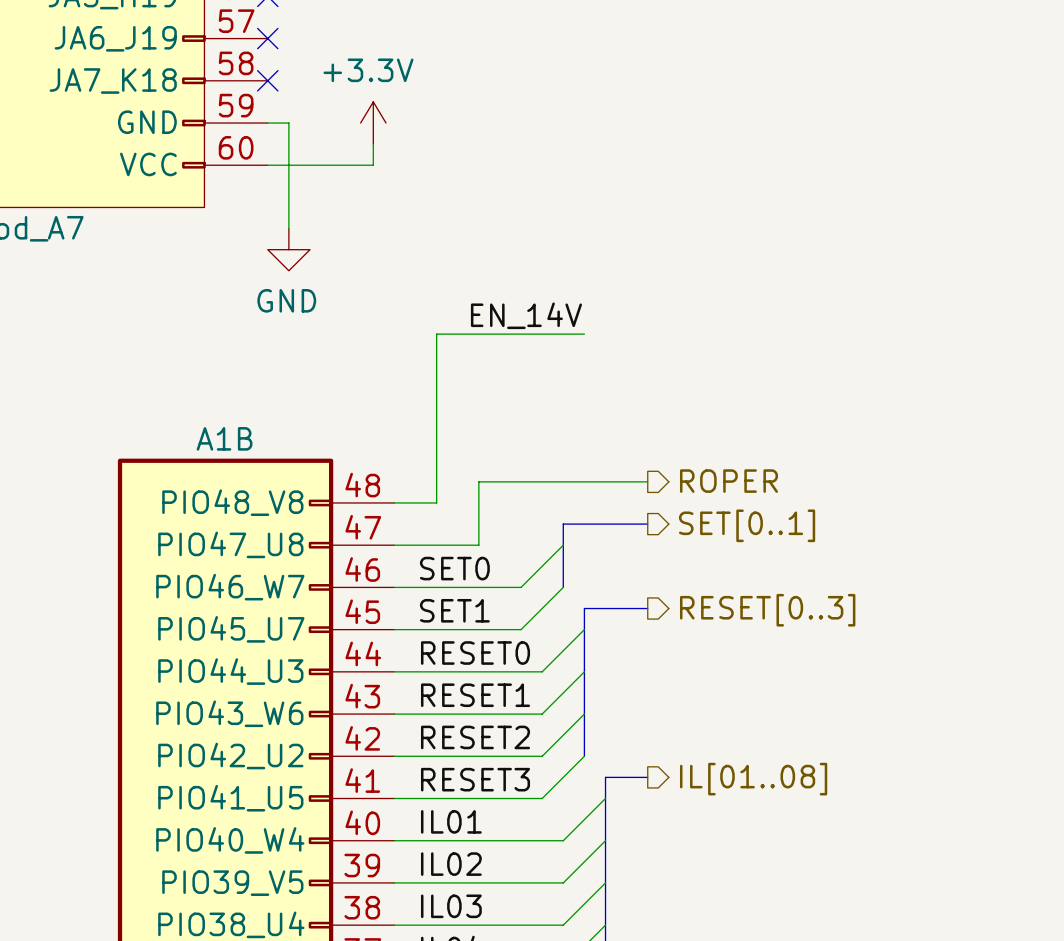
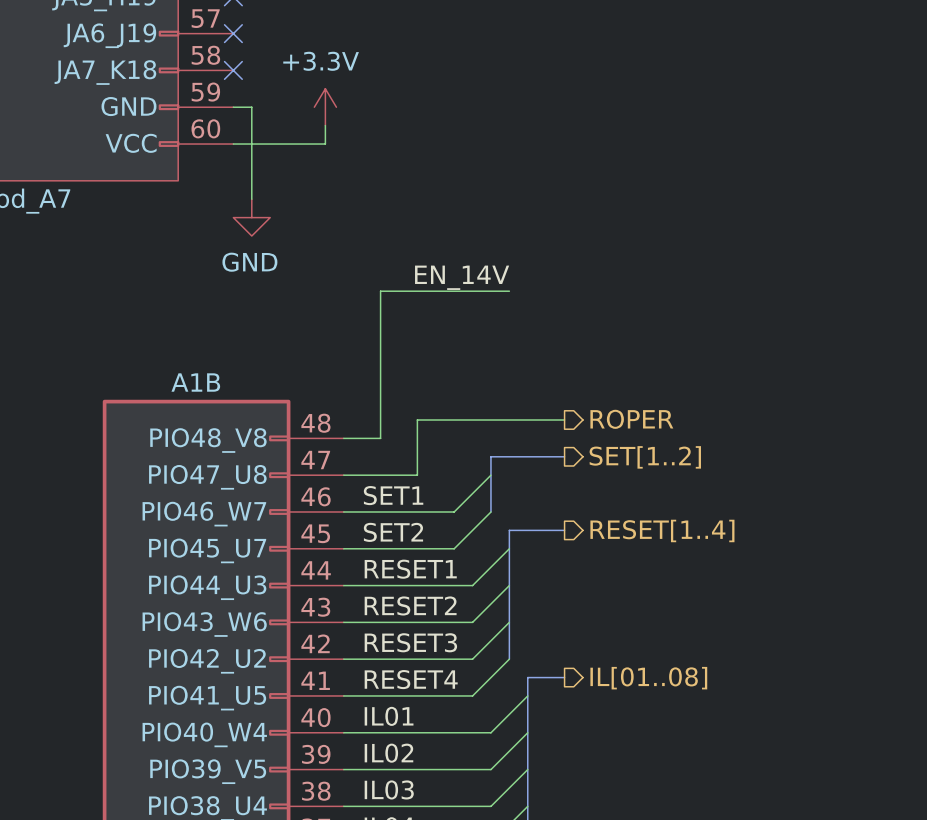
hierarchical label: SET[0..1] (747, 525) -> SET[1..2] (645, 457)
label: SET0 (454, 568) -> SET1 (393, 495)
label: SET1 (454, 610) -> SET2 (393, 532)
hierarchical label: RESET[0..3] (767, 610) -> RESET[1..4] (662, 530)
label: RESET0 (475, 653) -> RESET1 (410, 569)
label: RESET1 (475, 695) -> RESET2 (410, 605)
label: RESET2 (475, 737) -> RESET3 (410, 642)
label: RESET3 (475, 779) -> RESET4 (411, 679)

